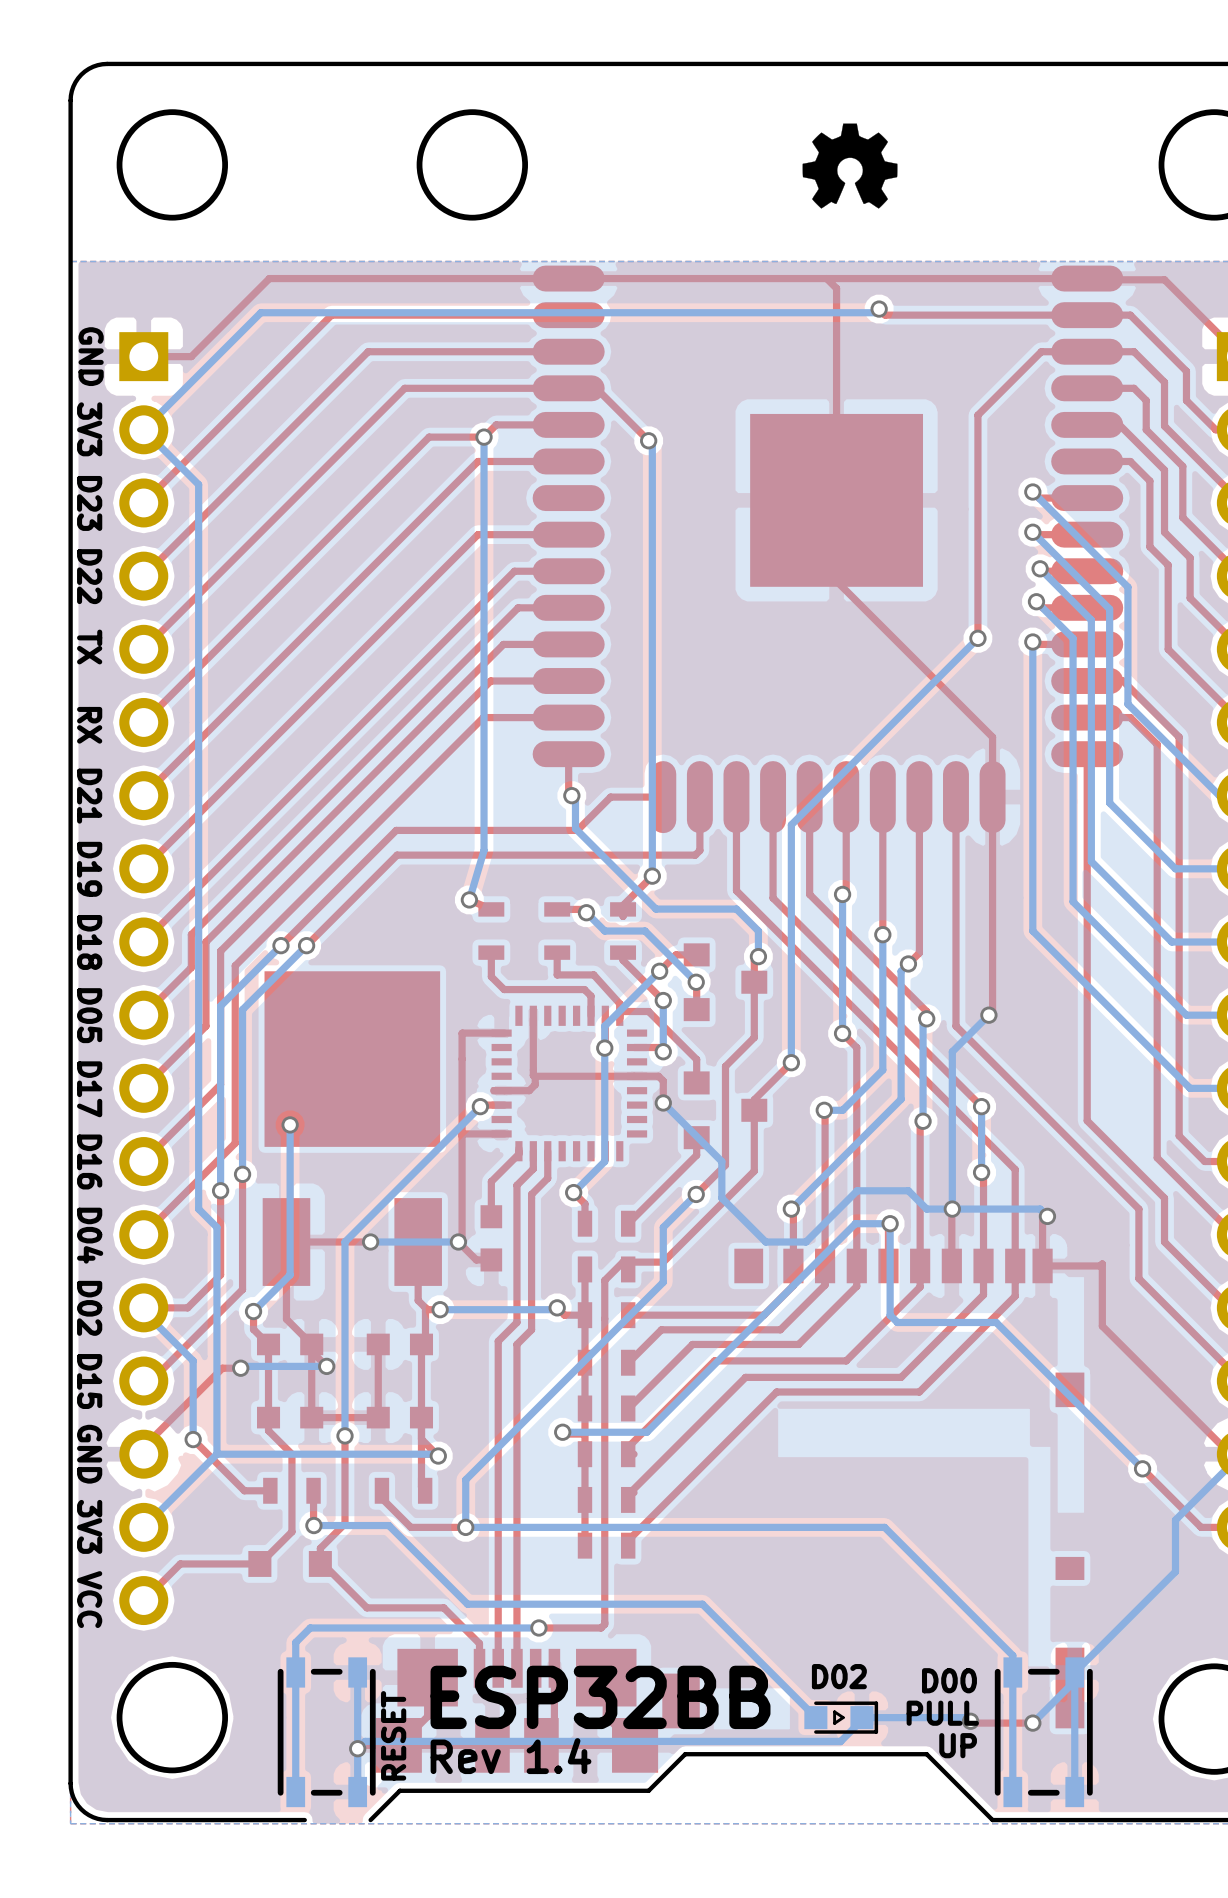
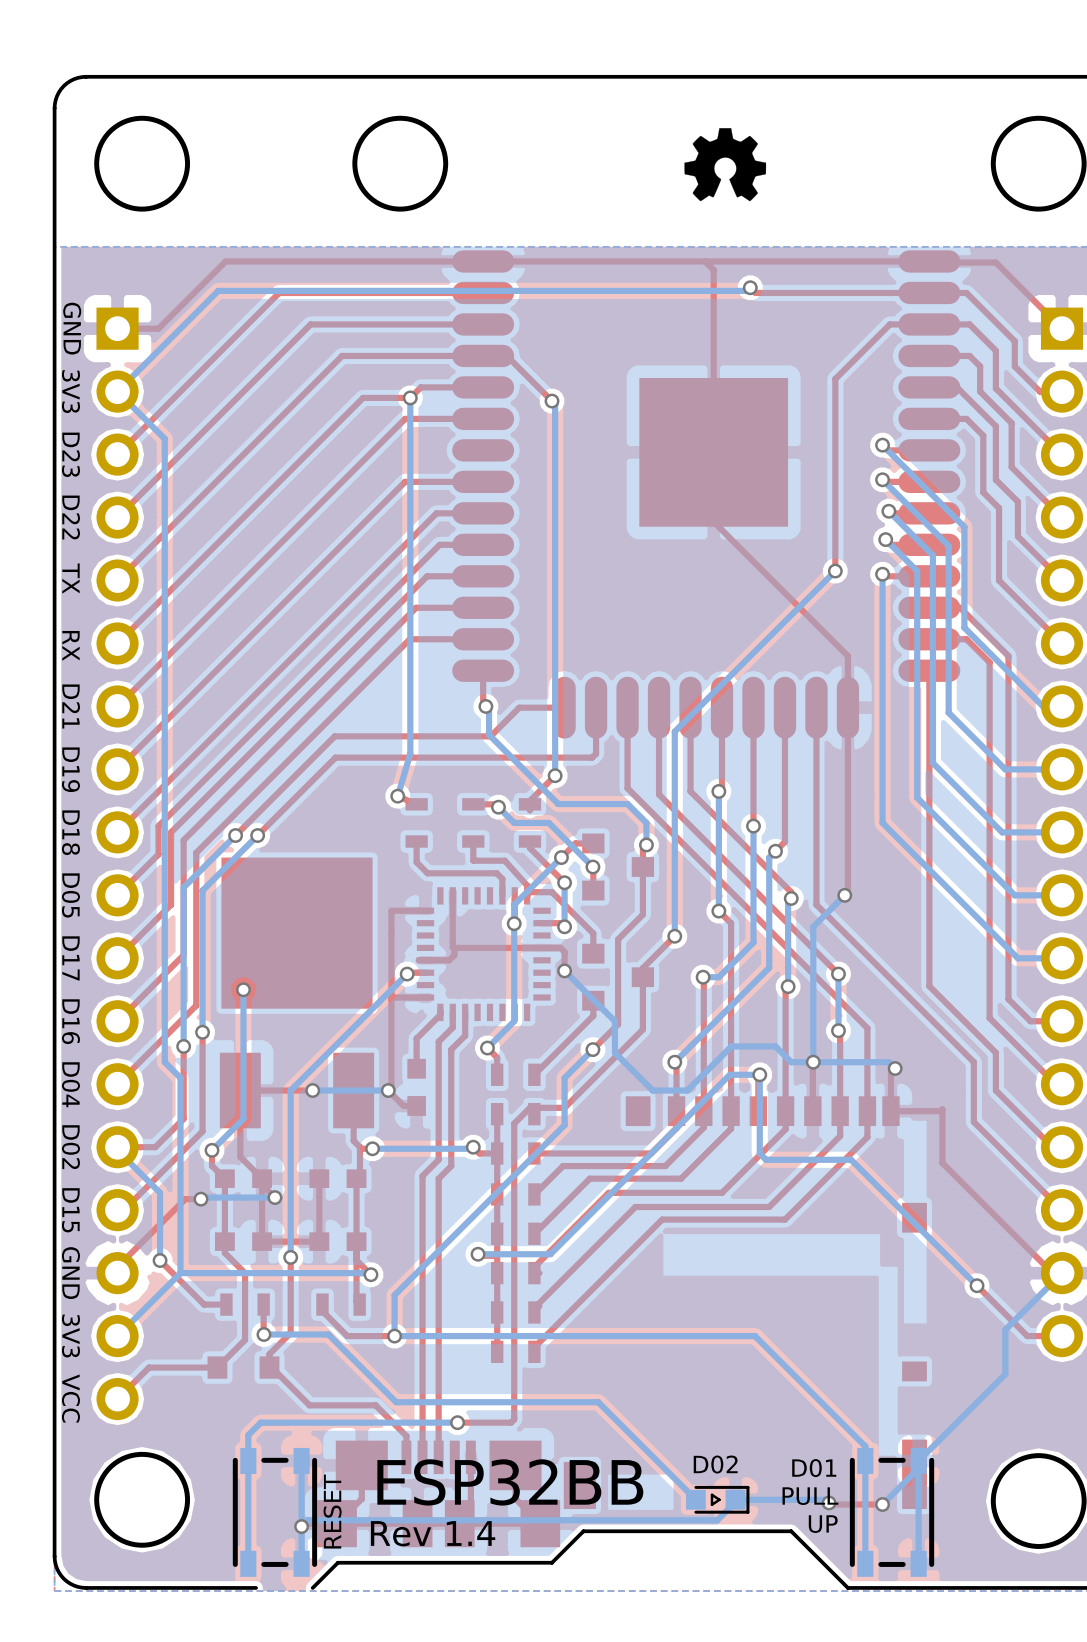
text: D00 (949, 1680) -> D01 (814, 1468)

